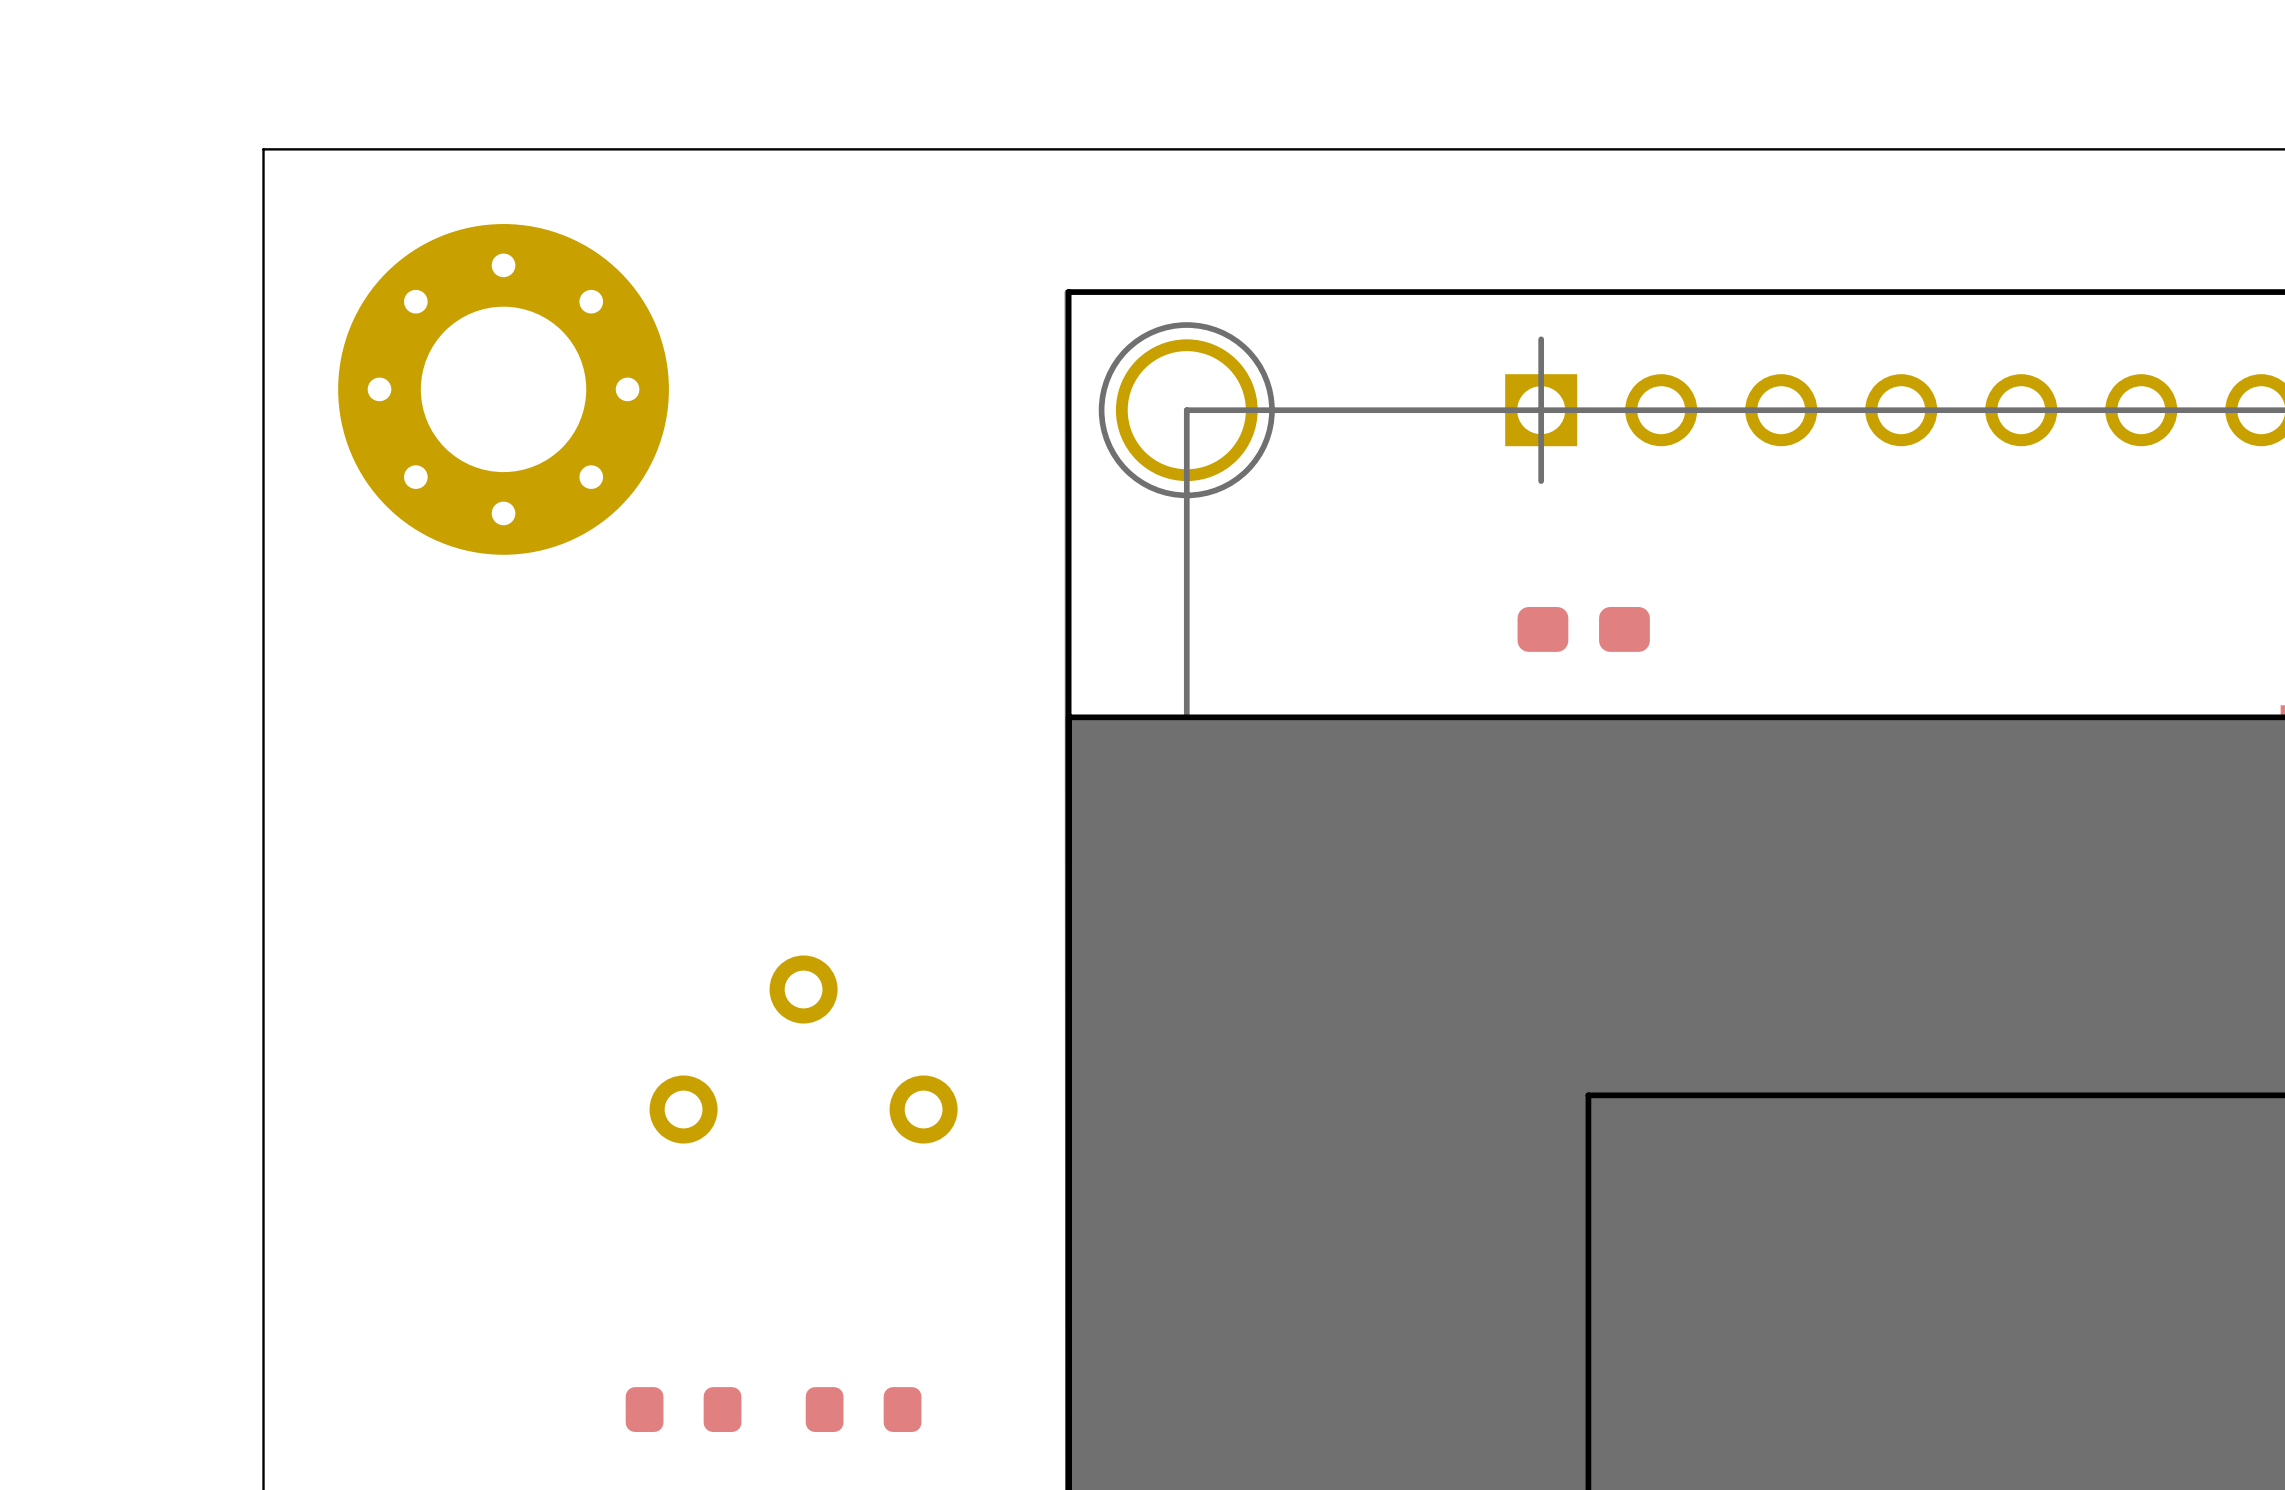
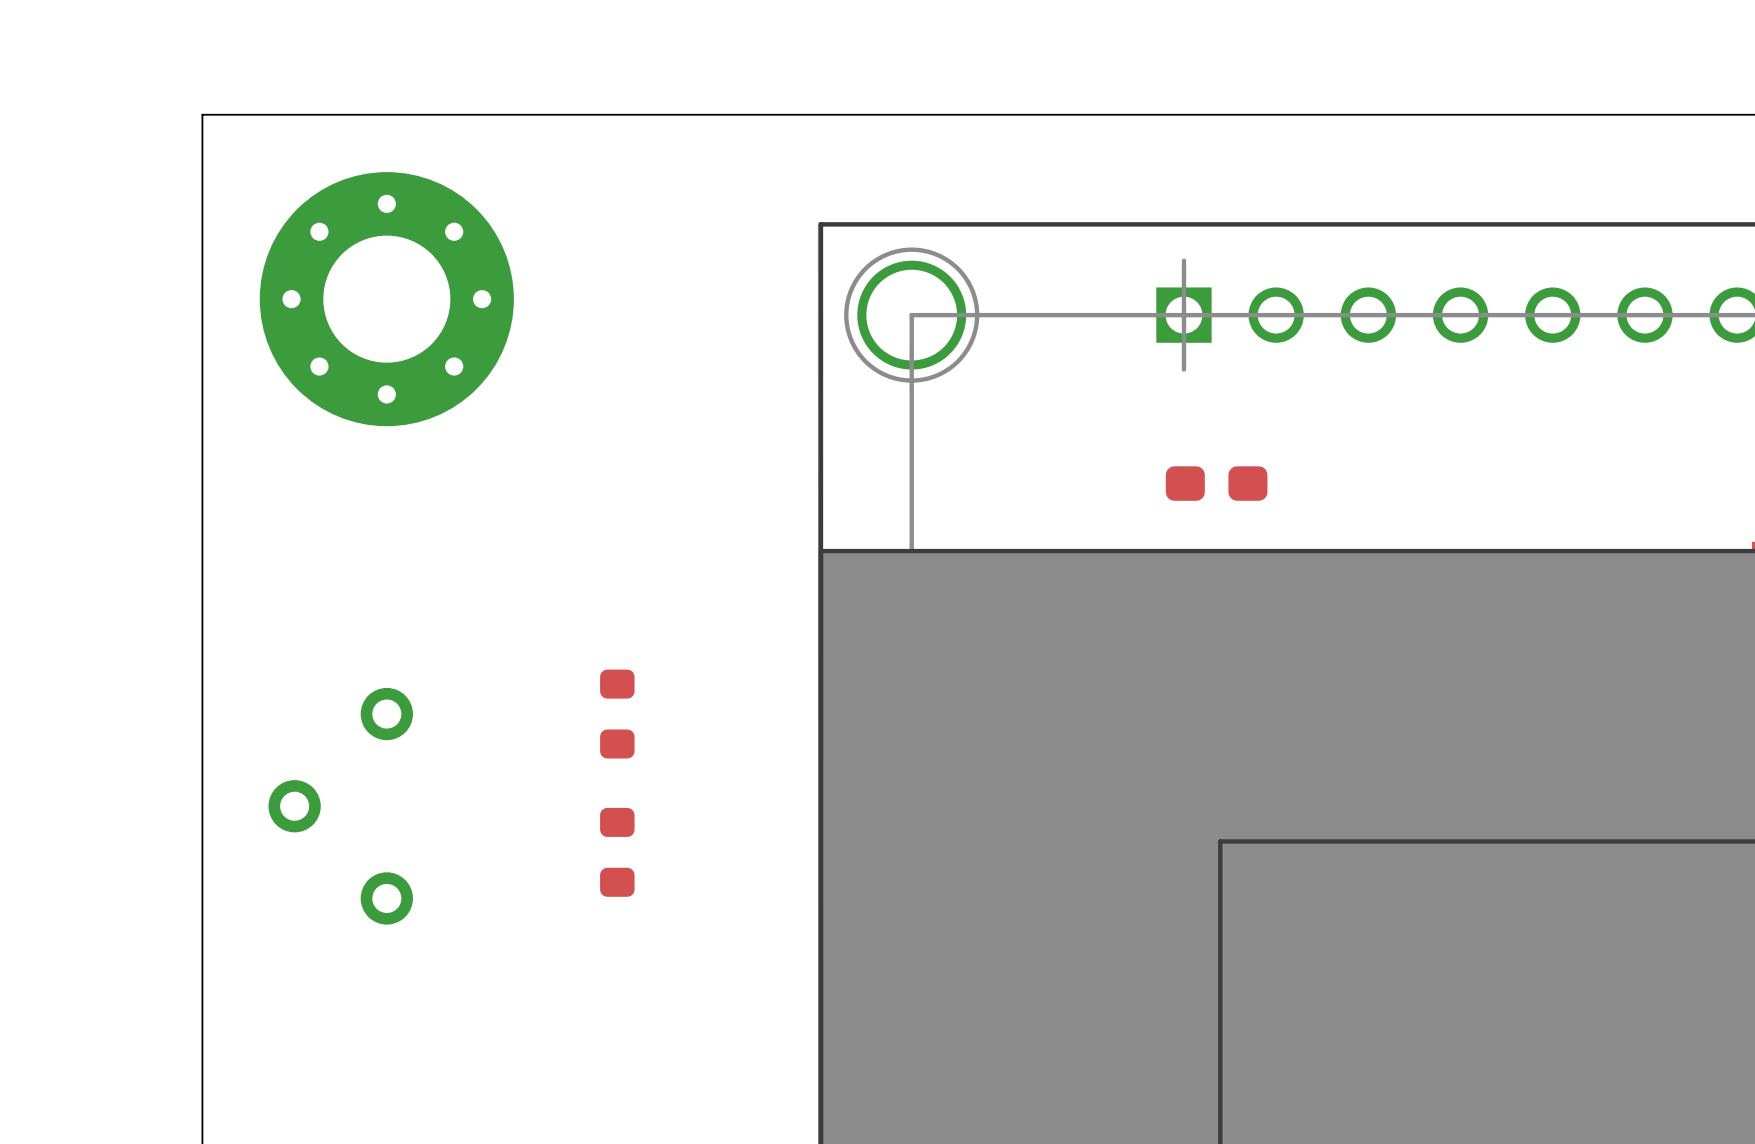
part: none -> (617, 714)
part rotation: 0° (803, 1049) -> 90° counterclockwise (340, 806)
part position: (803, 1049) -> (340, 806)
part: none -> (617, 852)
part: (683, 1409) -> none
part: (863, 1409) -> none

